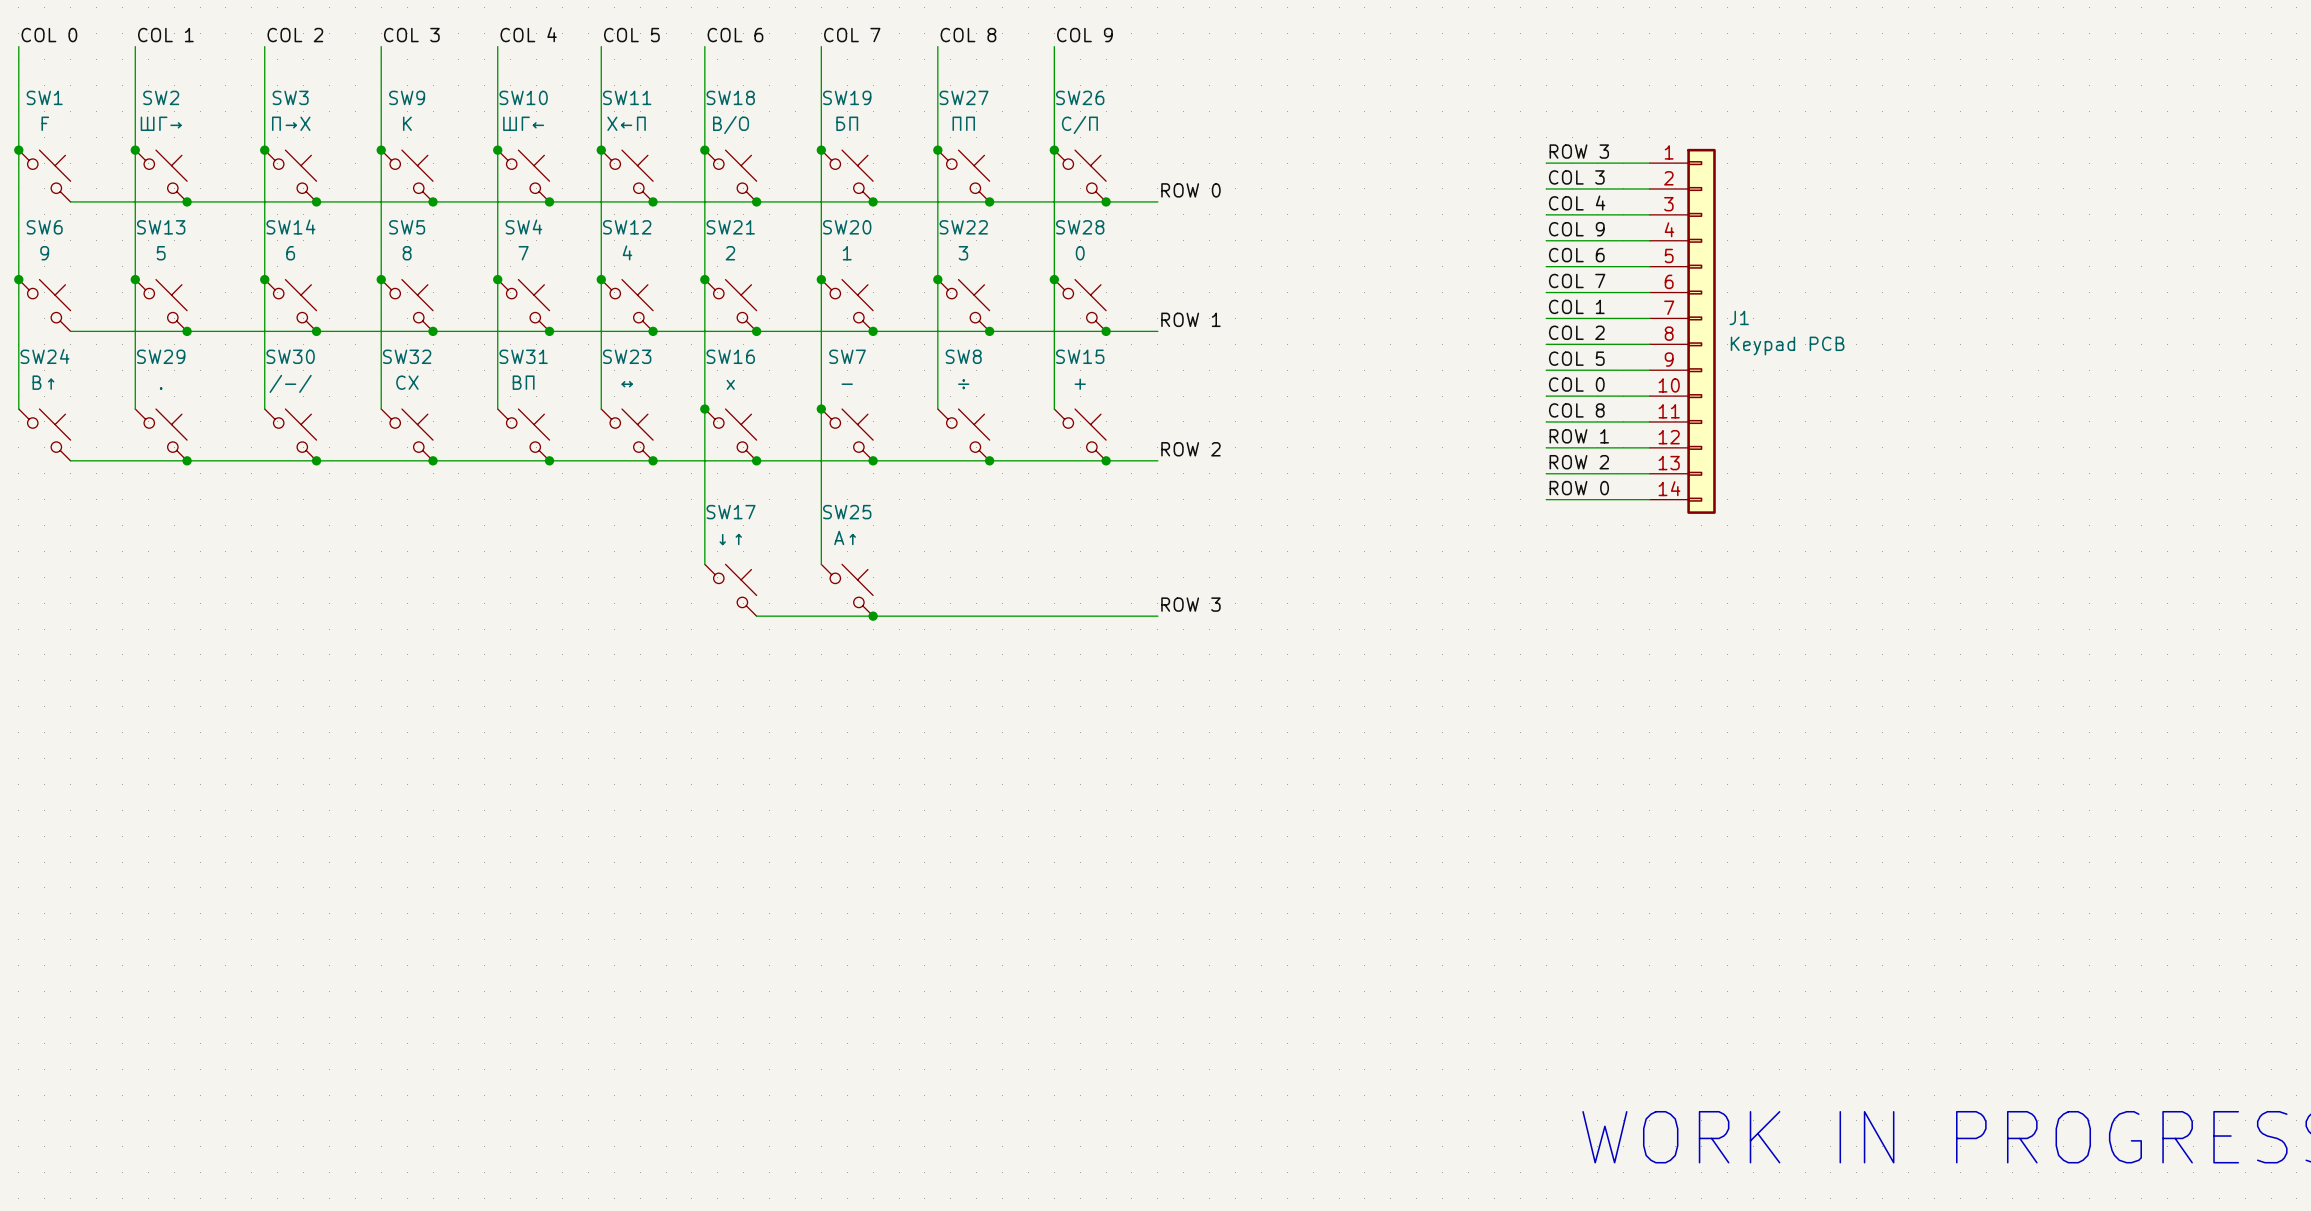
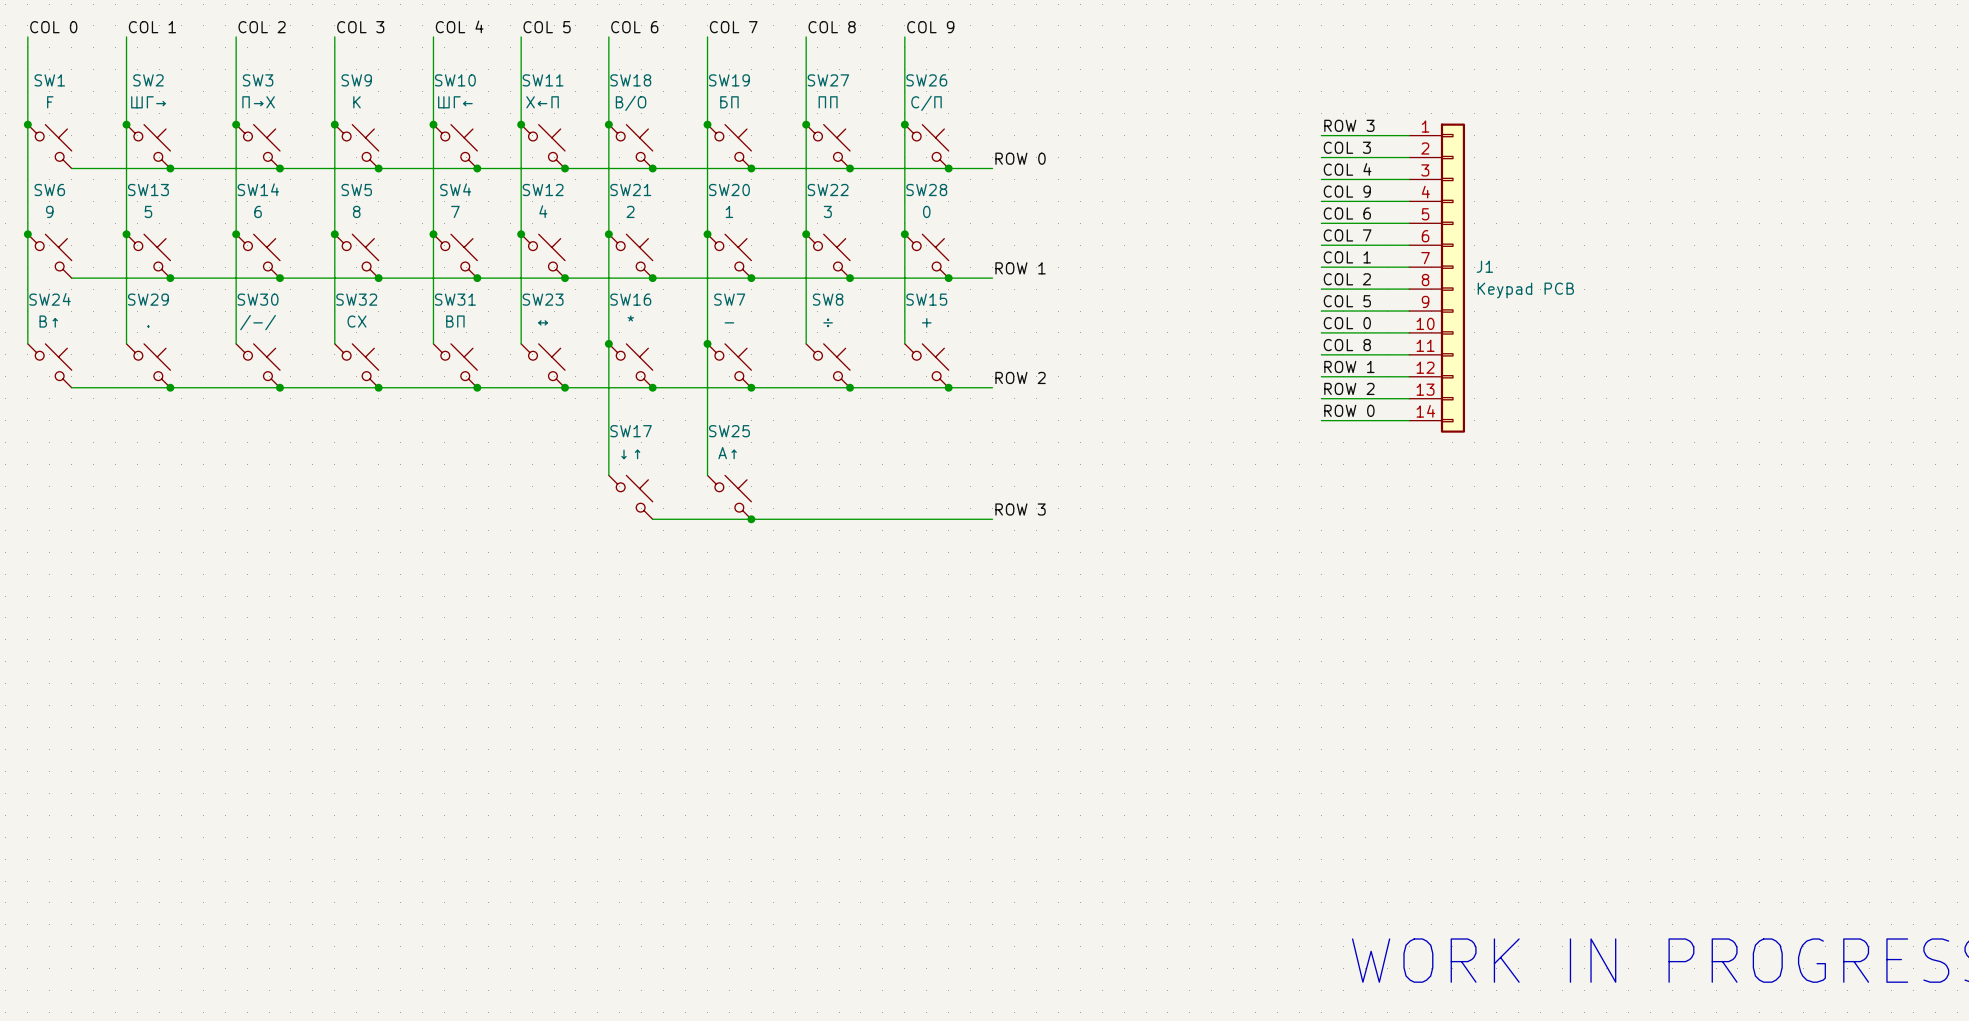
SW16 value: x (730, 384) -> * (630, 318)

